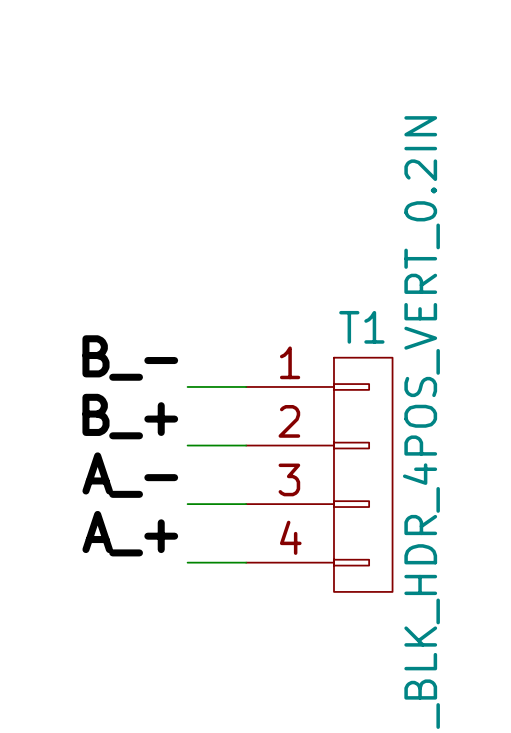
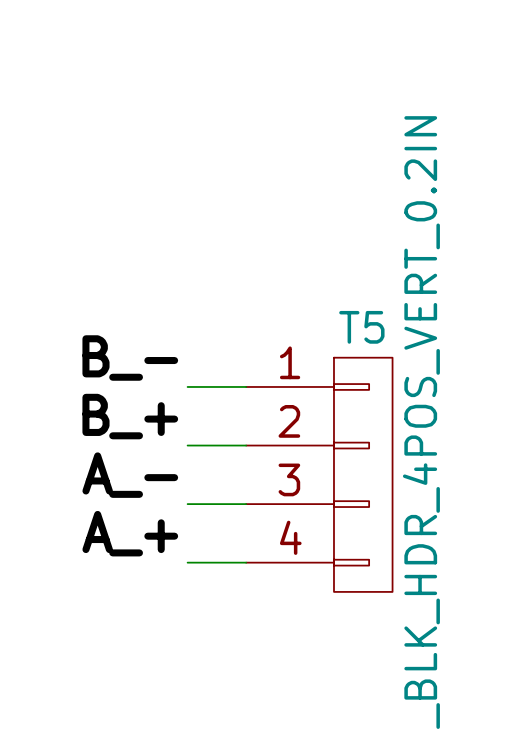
T1 name: T1 (361, 327) -> T5 (361, 327)

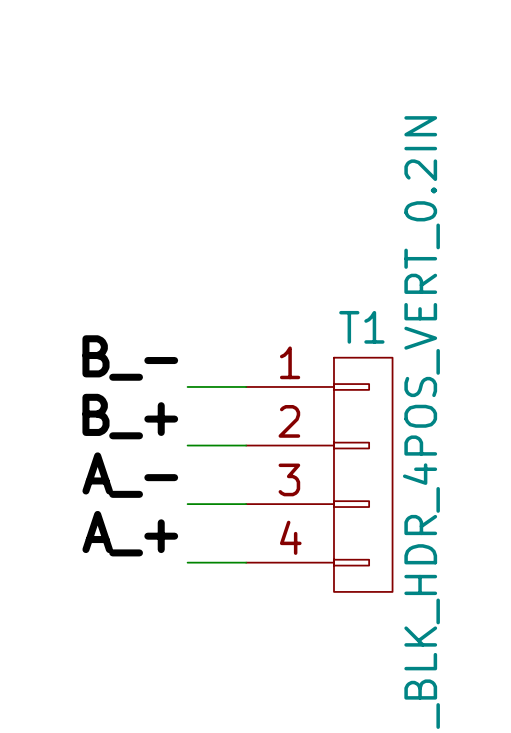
T5 name: T5 (361, 327) -> T1 (361, 327)

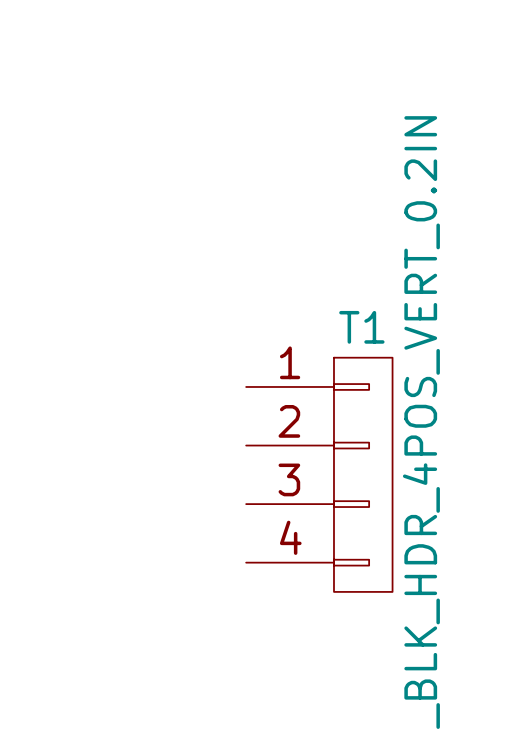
label: B_- (130, 358) -> none
wire: (187, 386) (246, 386) -> none
label: B_+ (130, 416) -> none
wire: (187, 445) (246, 445) -> none
label: A_- (130, 475) -> none
wire: (187, 504) (246, 504) -> none
label: A_+ (130, 533) -> none
wire: (187, 562) (246, 562) -> none

